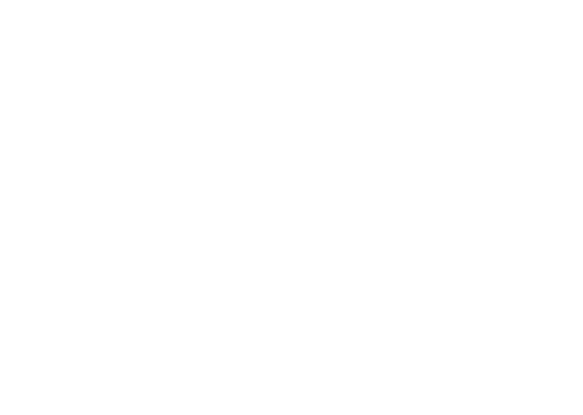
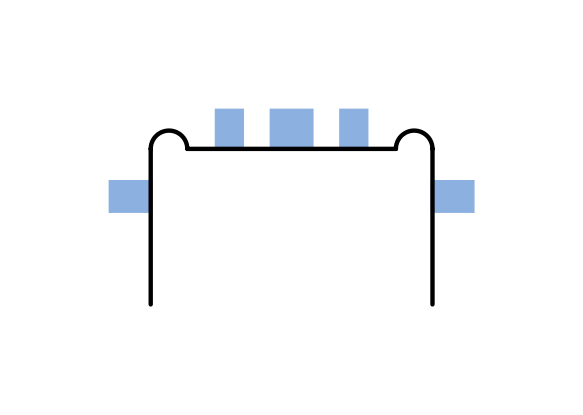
part: none -> (291, 207)

